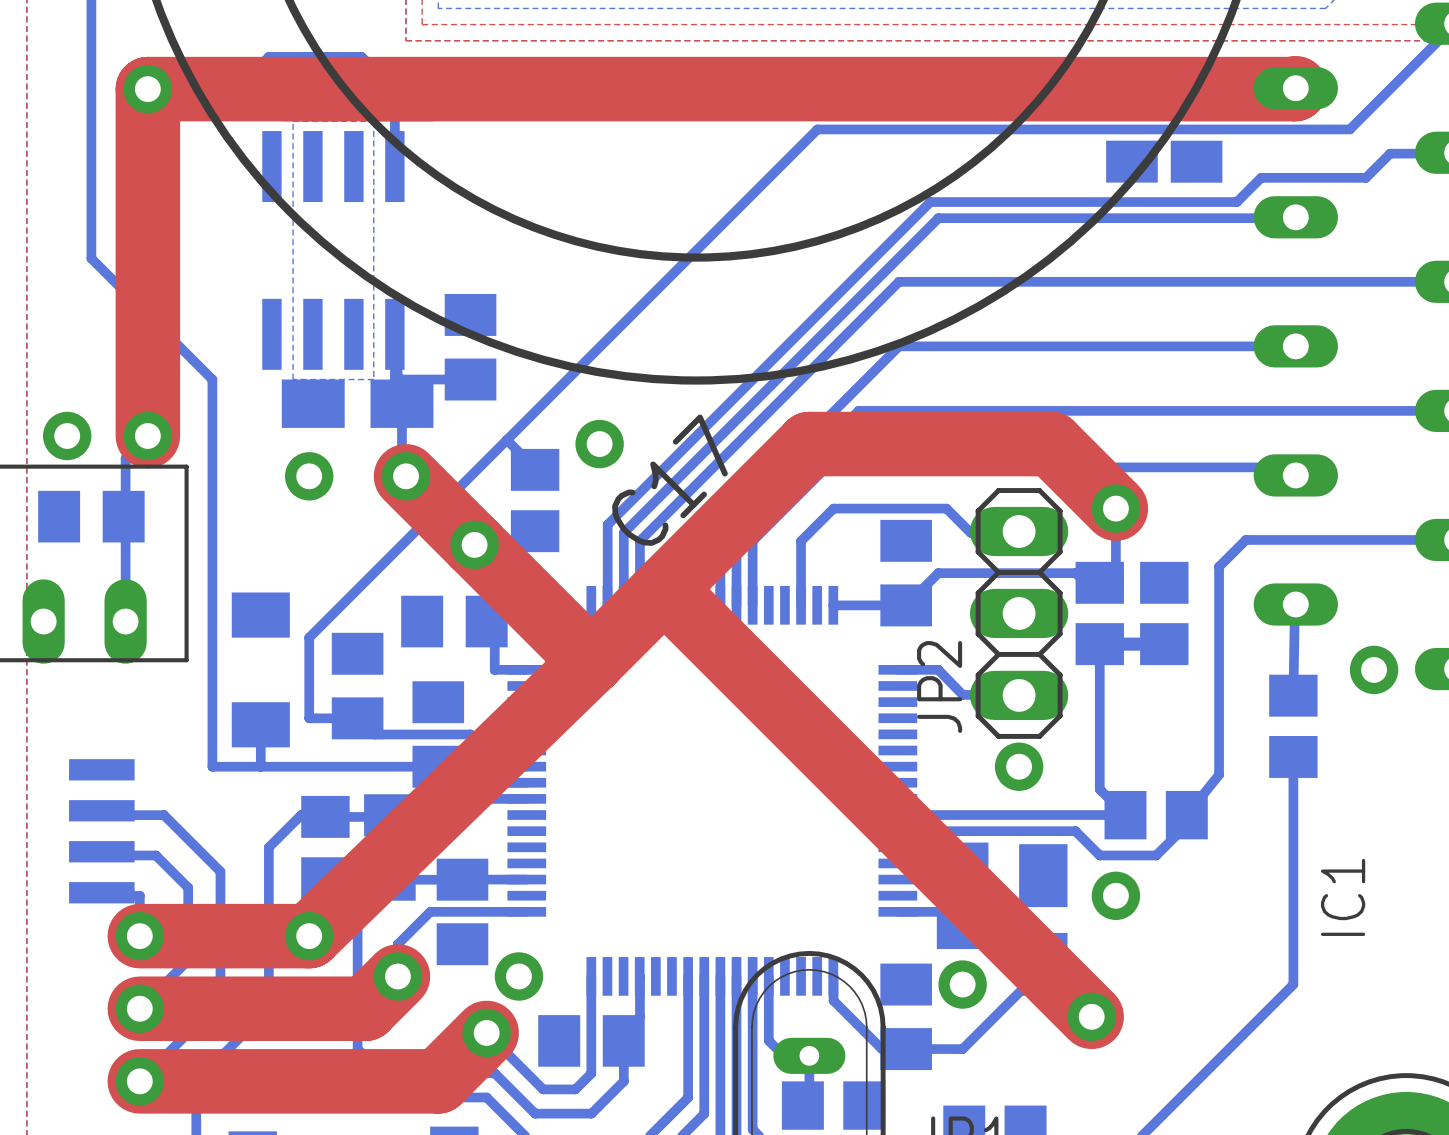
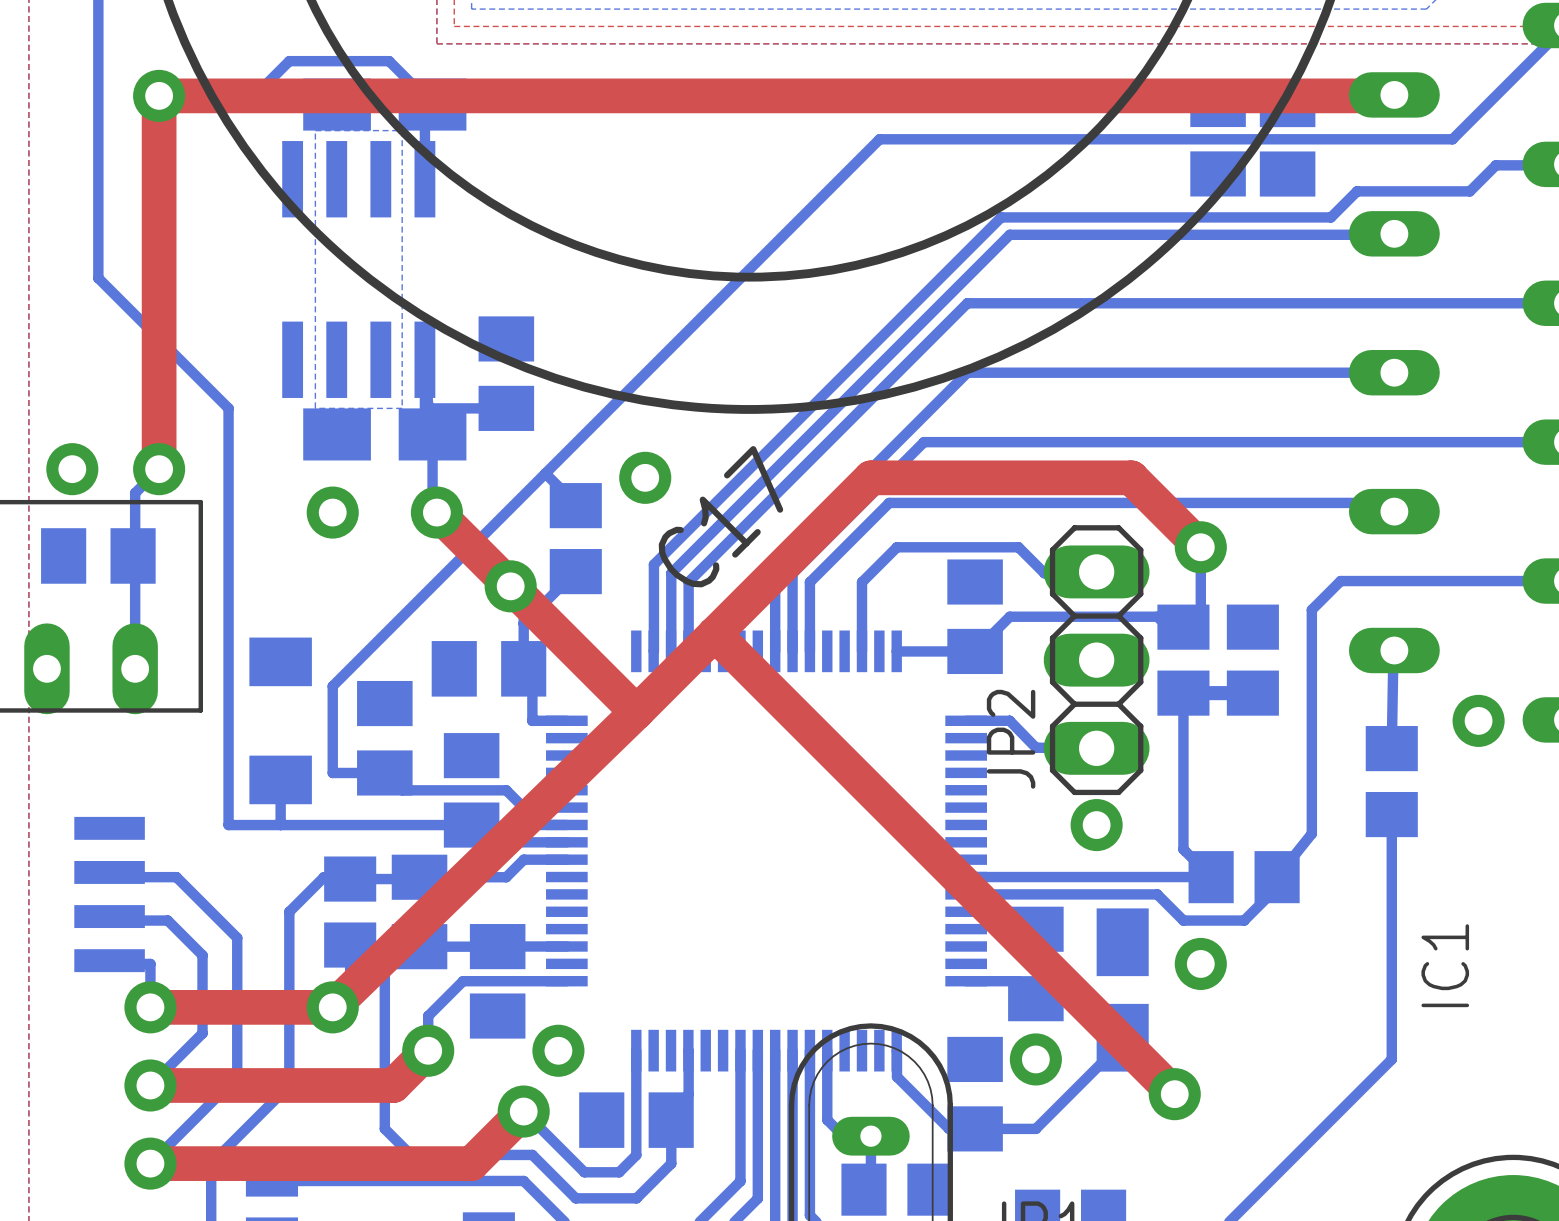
top track width: thick (1295, 88) (147, 89) (147, 435) -> thin (1394, 94) (159, 95) (159, 469)
top track width: thick (406, 476) (591, 661) -> thin (436, 512) (636, 712)
top track width: thick (1115, 508) (1051, 444) (809, 444) (591, 661) -> thin (1200, 547) (1131, 477) (870, 477) (636, 712)
top track width: thick (664, 589) (1091, 1016) -> thin (714, 634) (1174, 1094)
top track width: thick (591, 661) (309, 936) (139, 936) -> thin (636, 712) (332, 1007) (150, 1007)
top track width: thick (397, 976) (365, 1008) (139, 1008) -> thin (428, 1050) (393, 1085) (150, 1085)
top track width: thick (486, 1032) (438, 1081) (139, 1081) -> thin (523, 1111) (471, 1163) (150, 1163)

